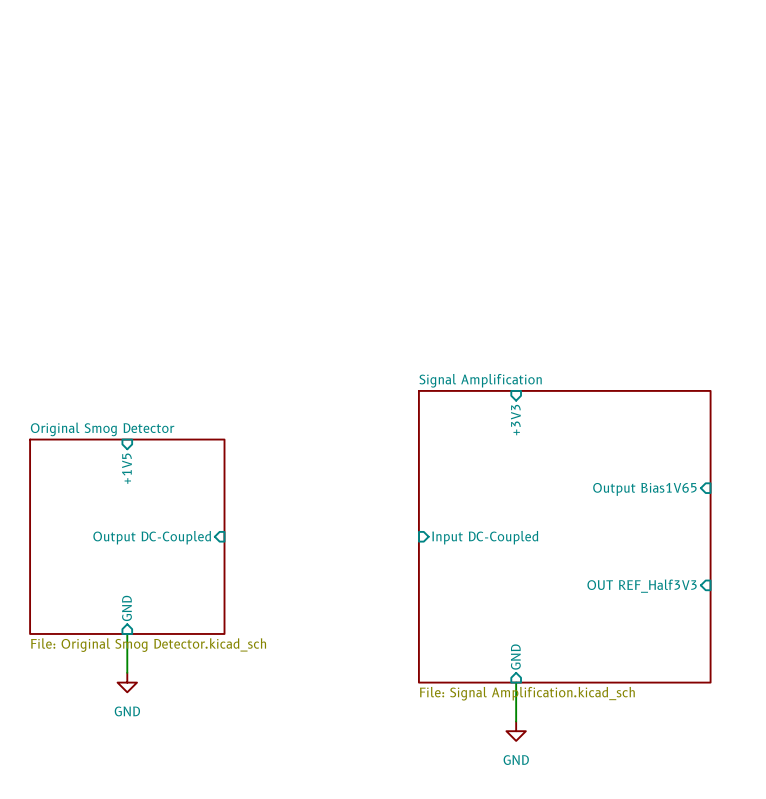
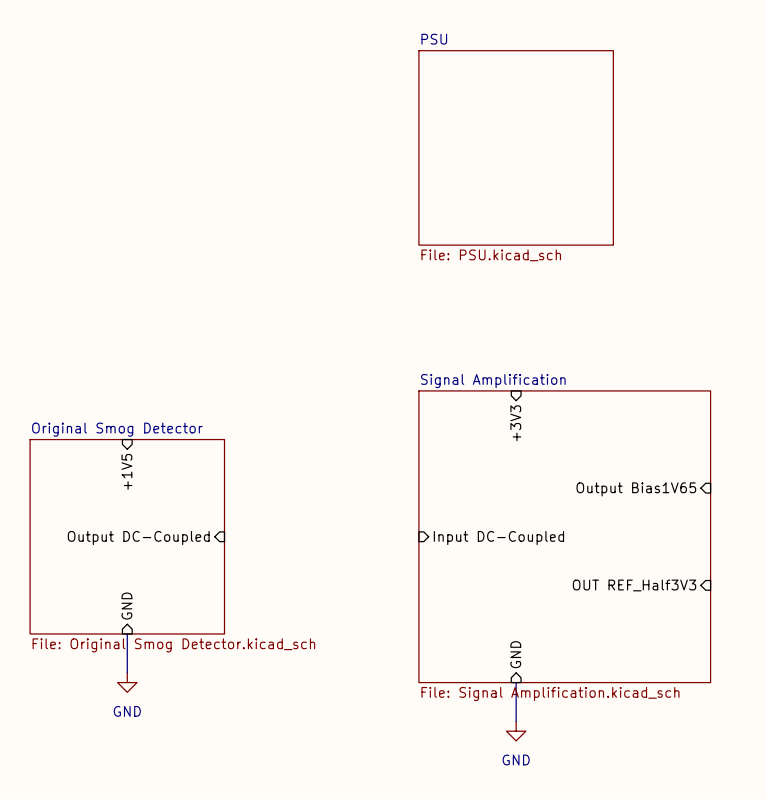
sheet PSU: none -> File: PSU.kicad_sch (516, 147)

